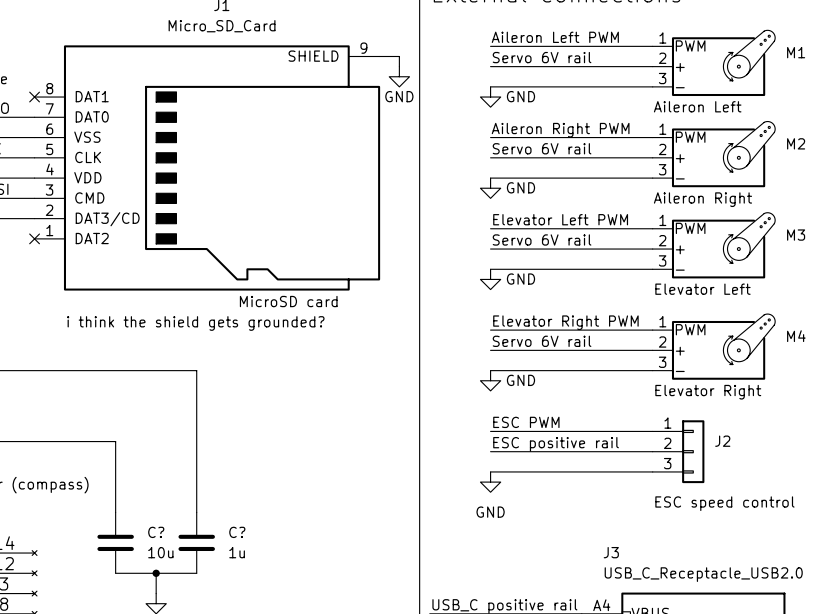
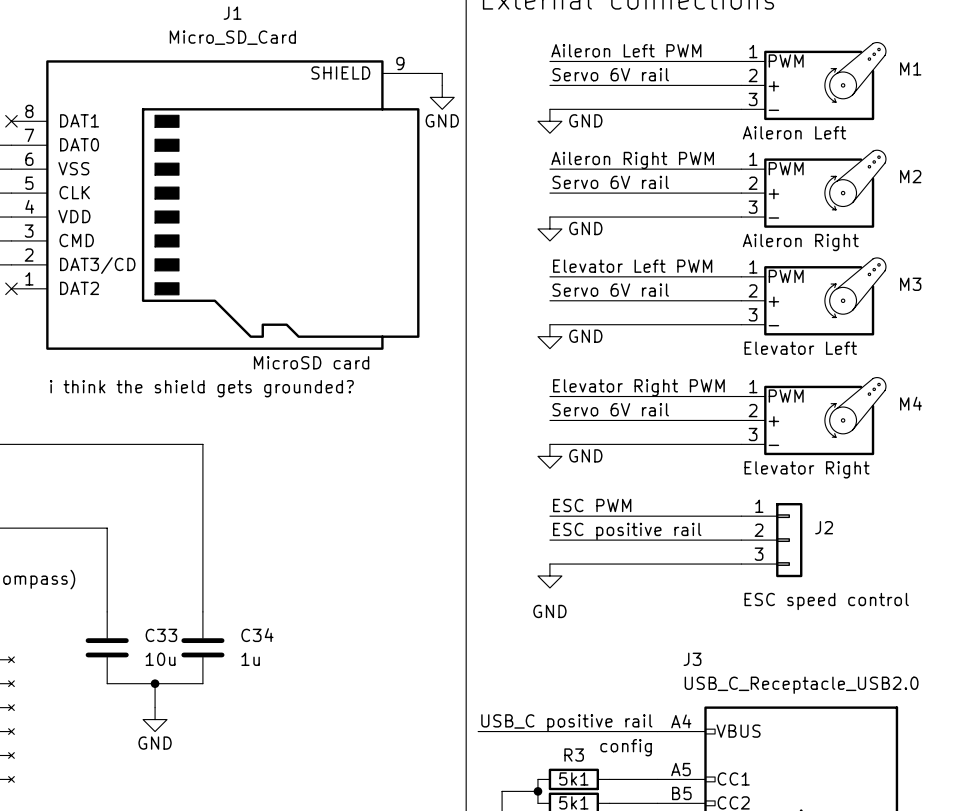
C? name: C? (156, 532) -> C33 (161, 635)
C? name: C? (237, 532) -> C34 (257, 635)

